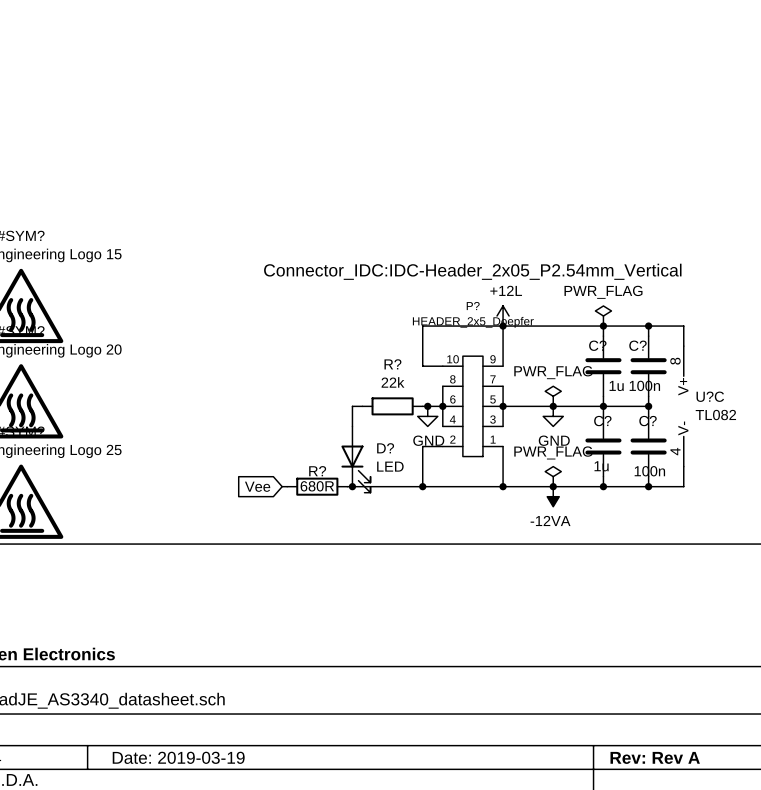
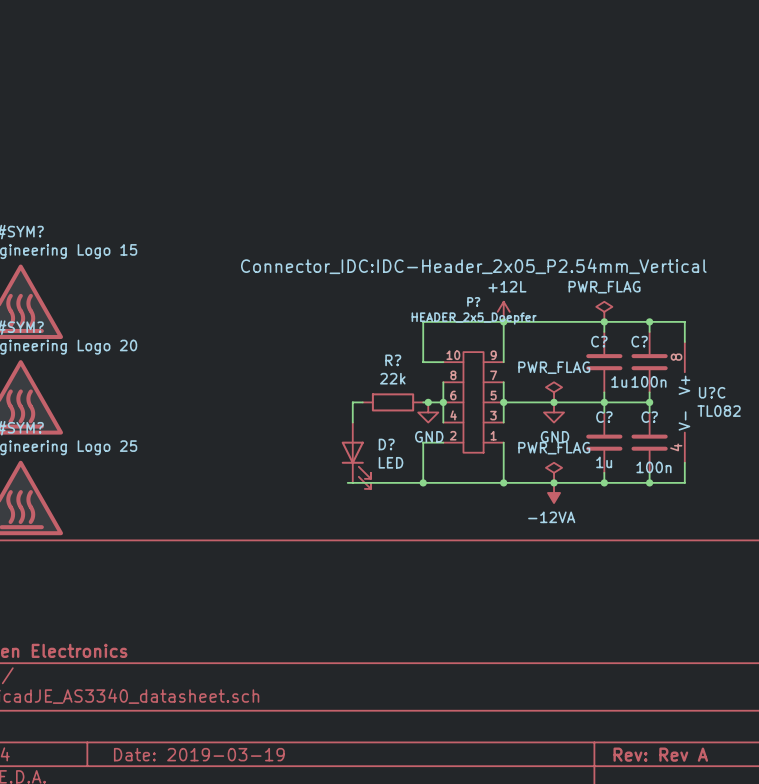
global label: Vee (257, 486) -> none
wire: (282, 486) (287, 486) -> none
R?: 680R (317, 486) -> none
junction: (352, 486) -> none

